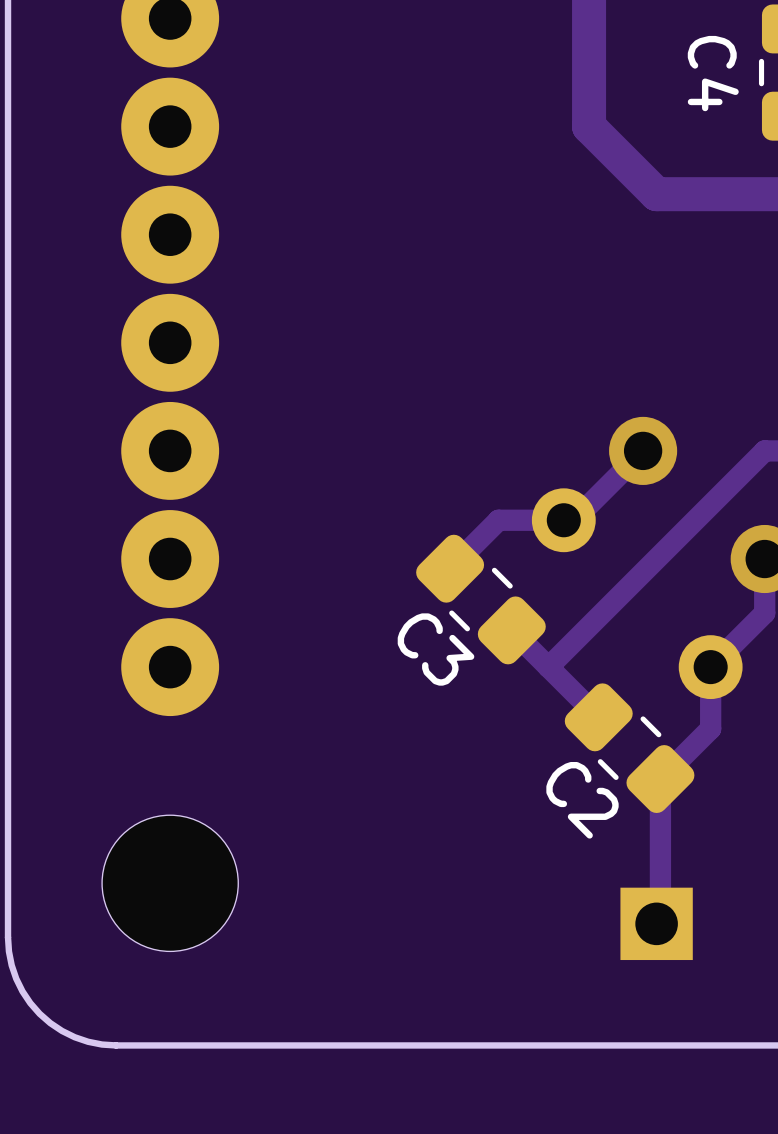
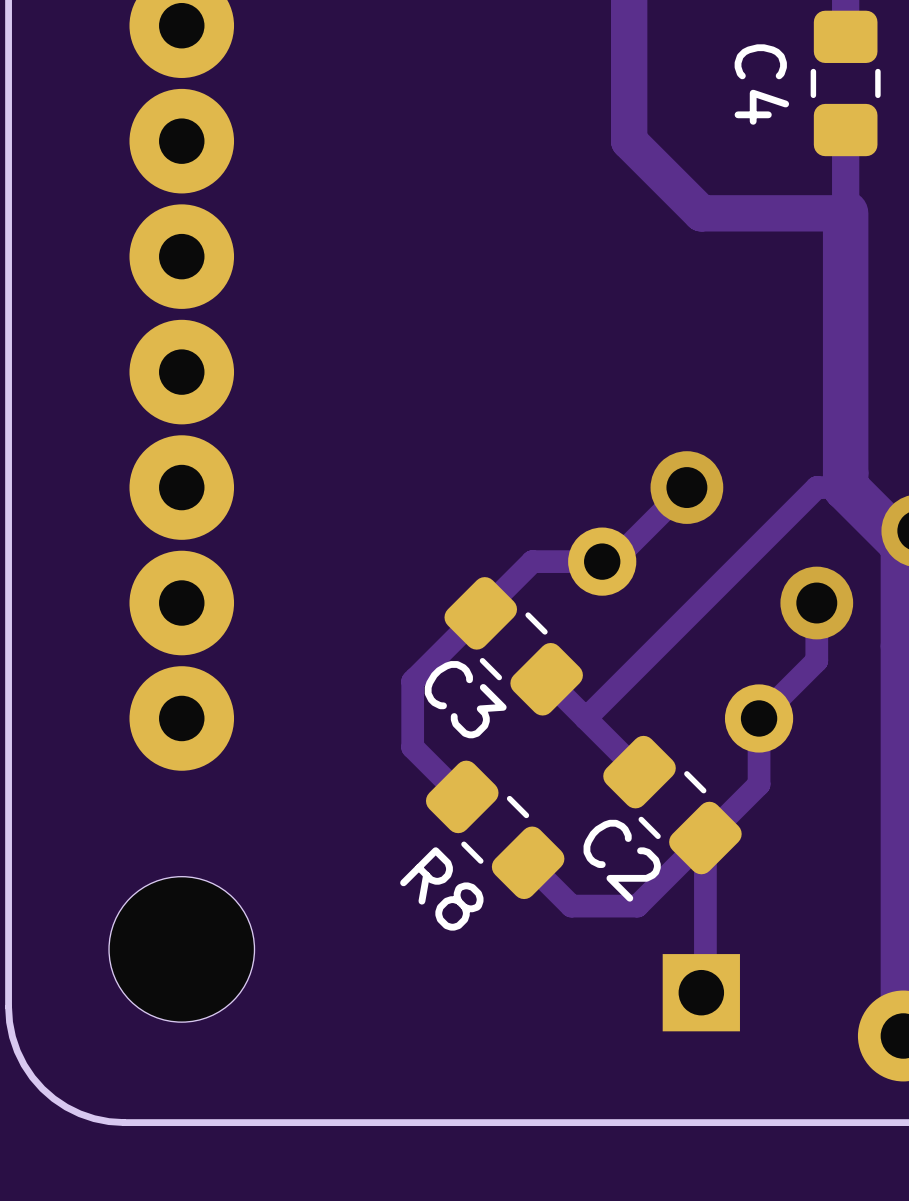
track: none -> (480, 613) (412, 681) (412, 747) (462, 796)
R8: none -> (495, 829)
track: none -> (705, 838) (637, 906) (571, 906) (528, 862)

